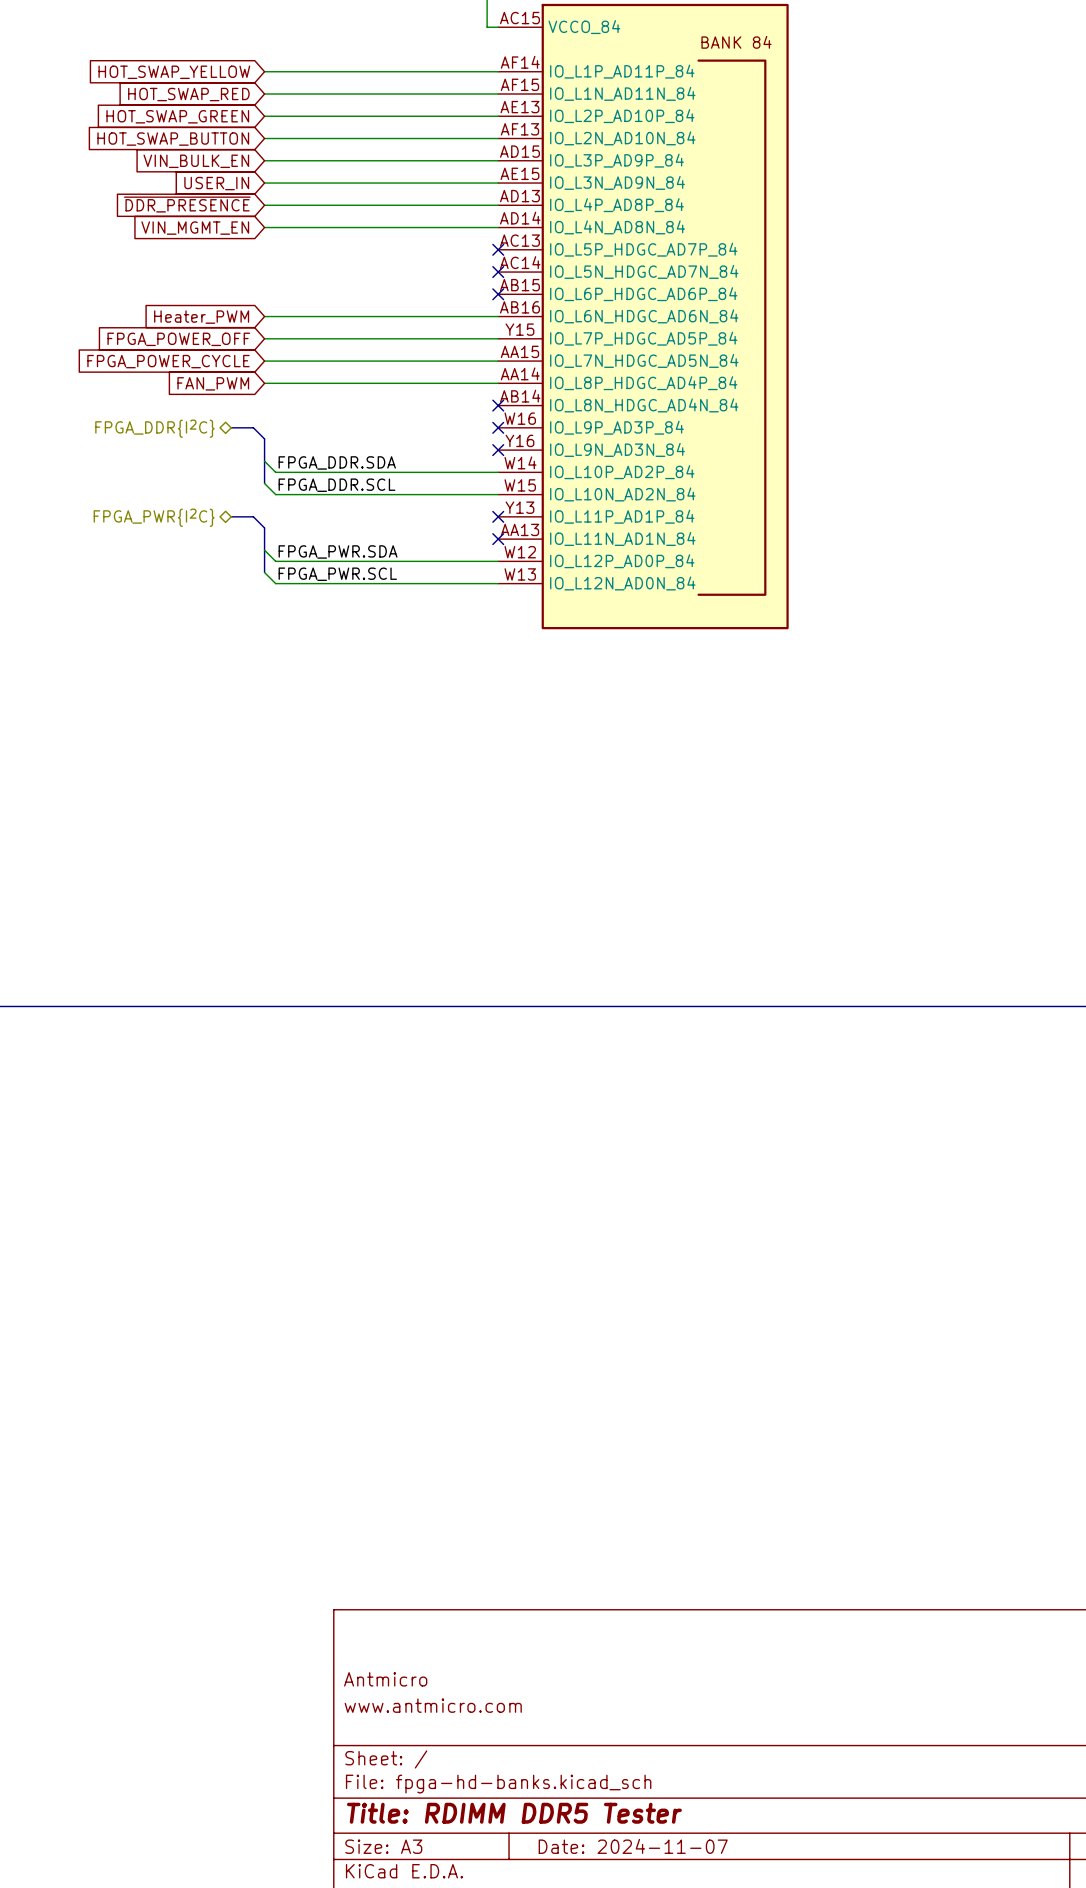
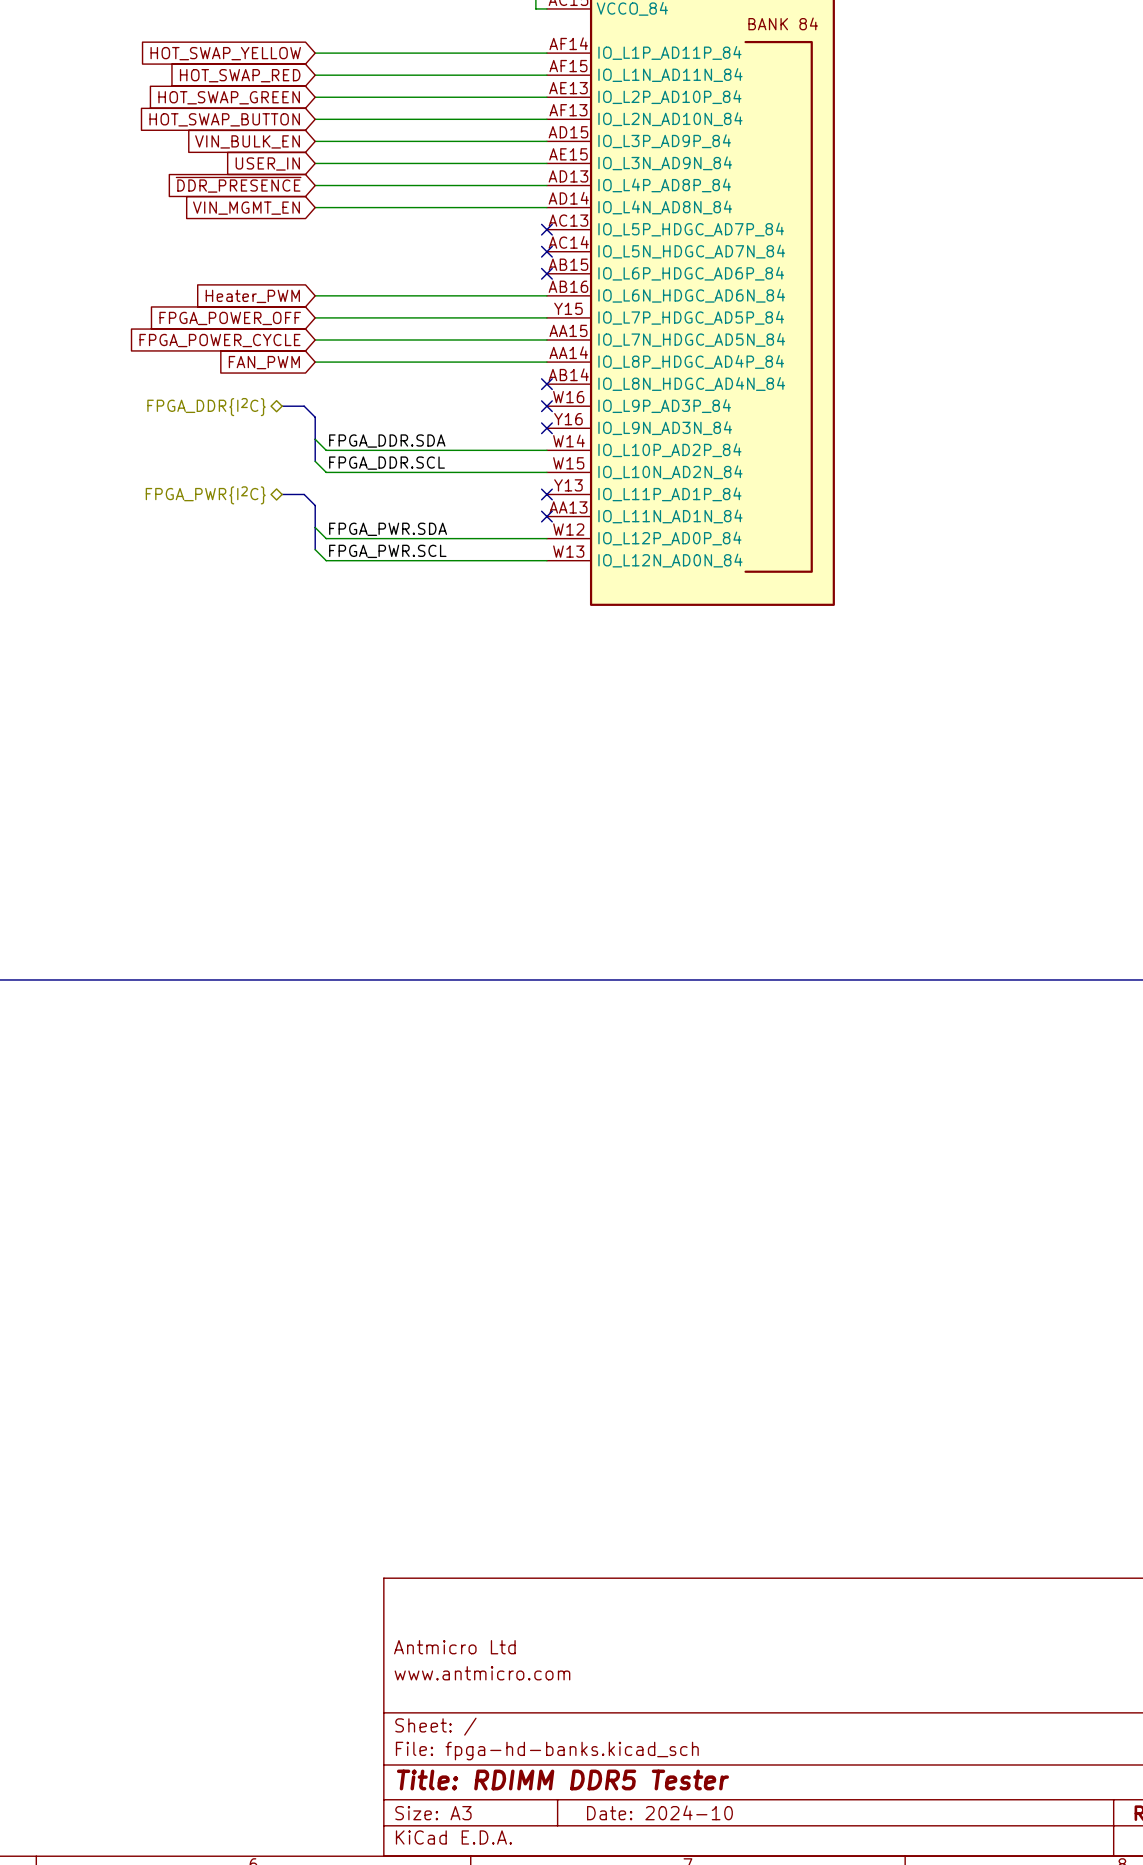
title block: Antmicro (385, 1679) -> Antmicro Ltd (454, 1647)
title block: Date: 2024-11-07 (633, 1846) -> Date: 2024-10 (659, 1812)

